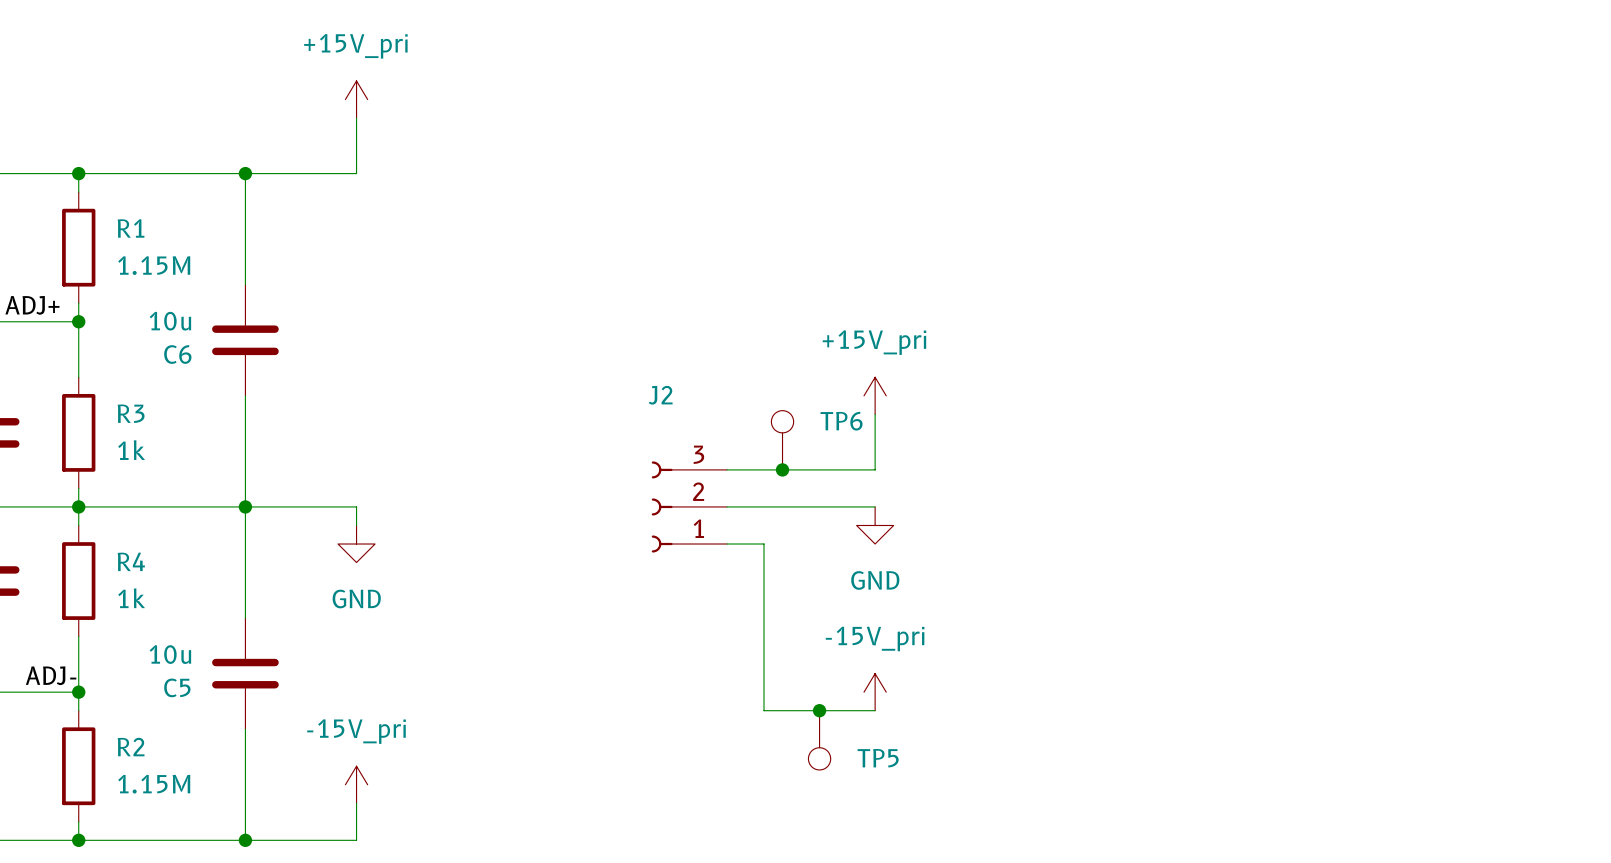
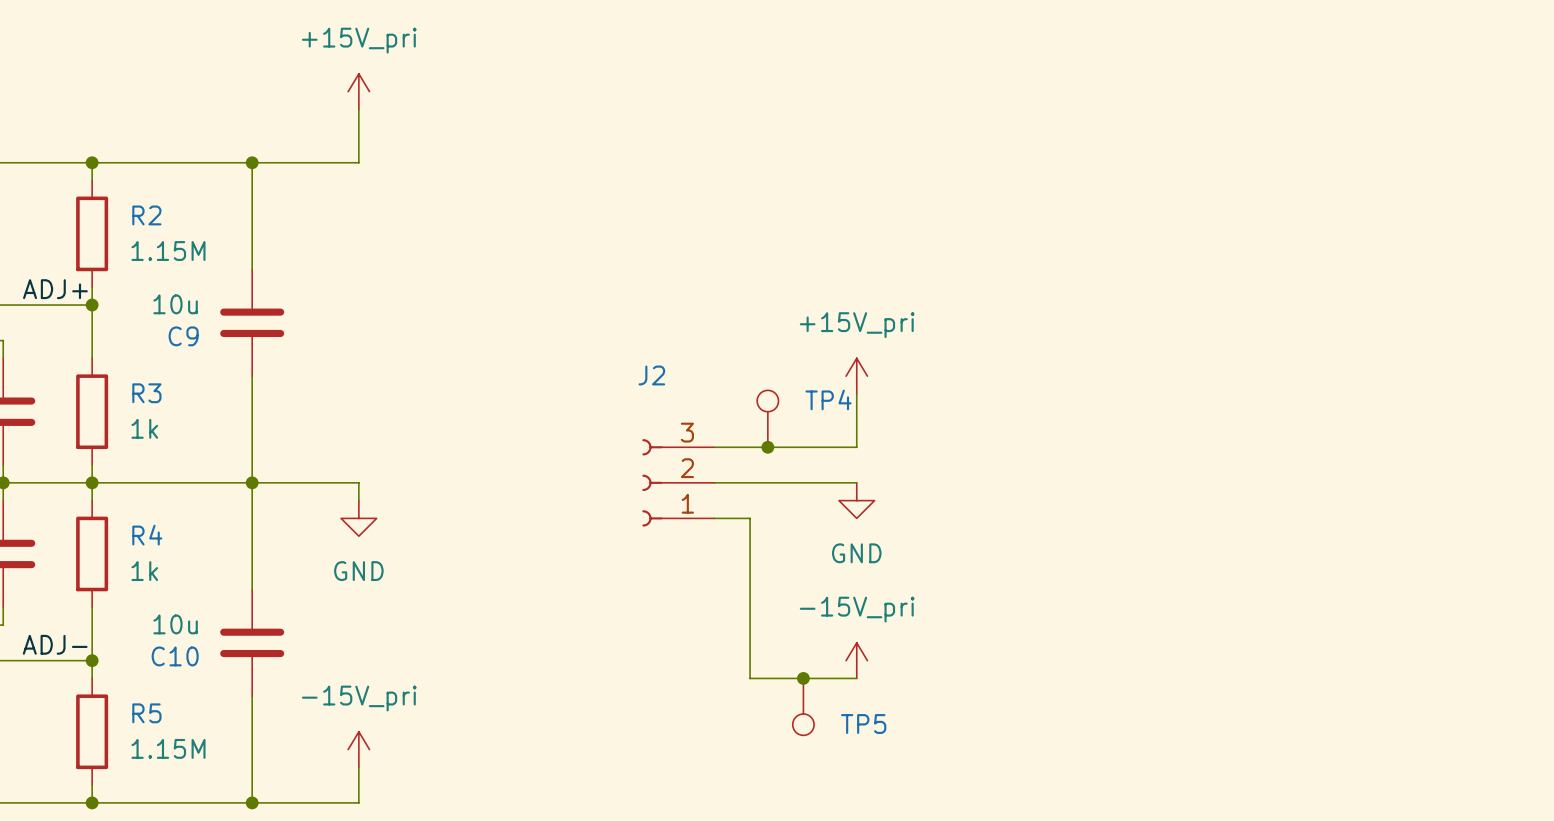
R1 name: R1 (131, 228) -> R2 (146, 215)
C6 name: C6 (177, 354) -> C9 (183, 336)
TP6 name: TP6 (841, 421) -> TP4 (828, 399)
C5 name: C5 (177, 687) -> C10 (175, 656)
R2 name: R2 (131, 747) -> R5 (146, 713)

